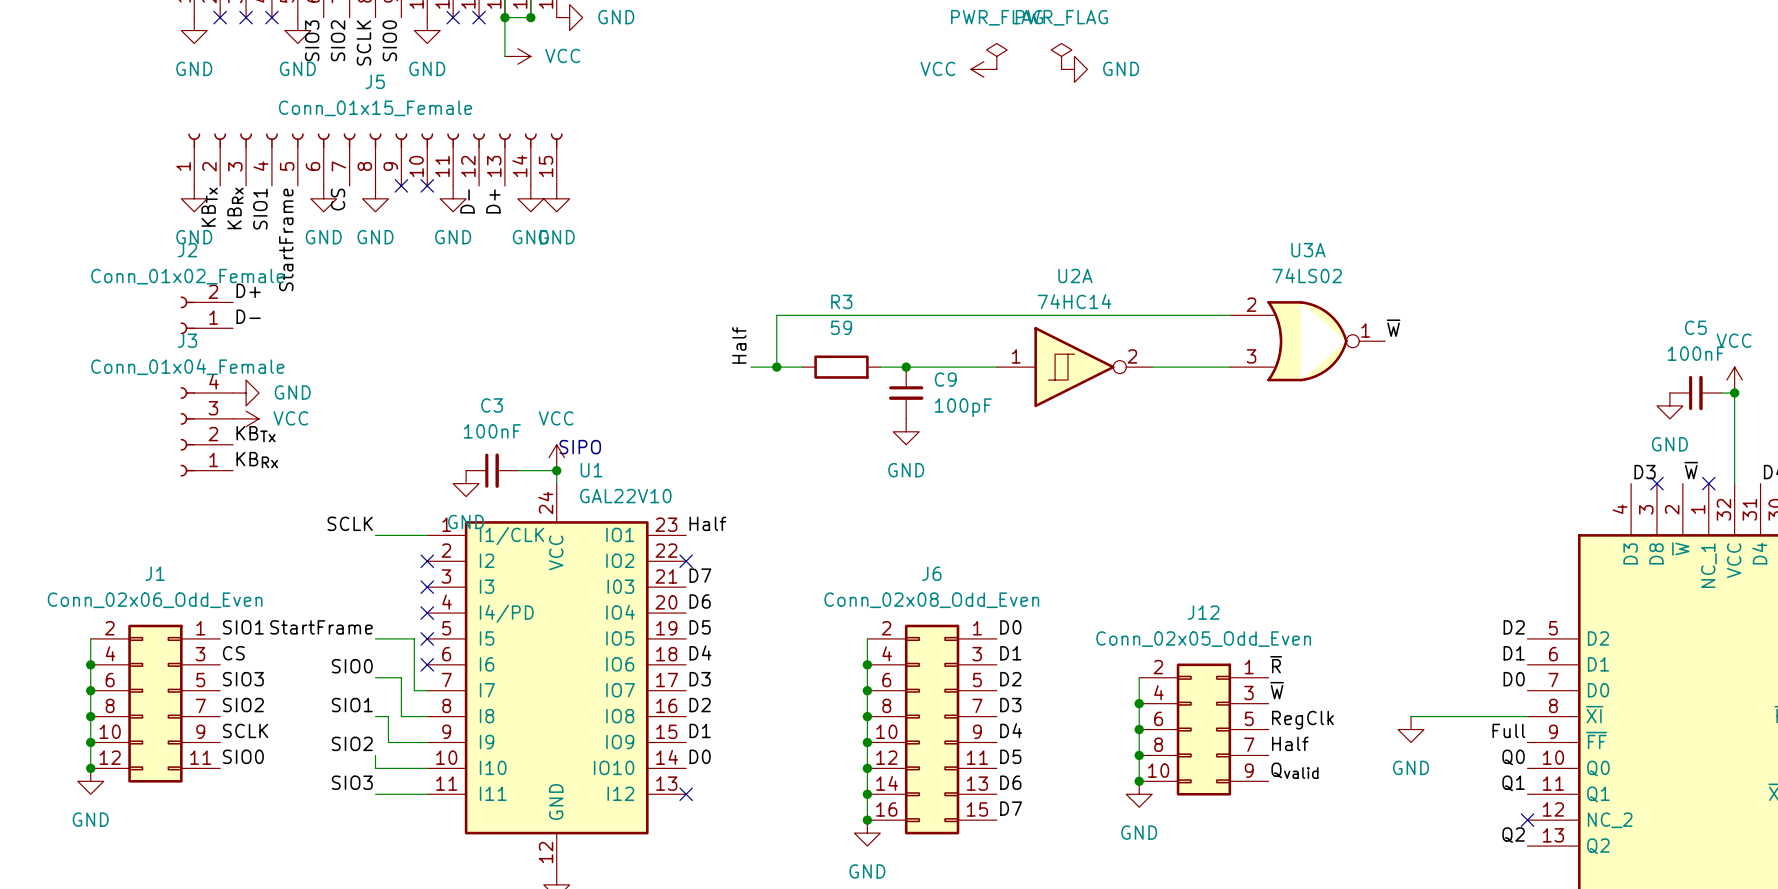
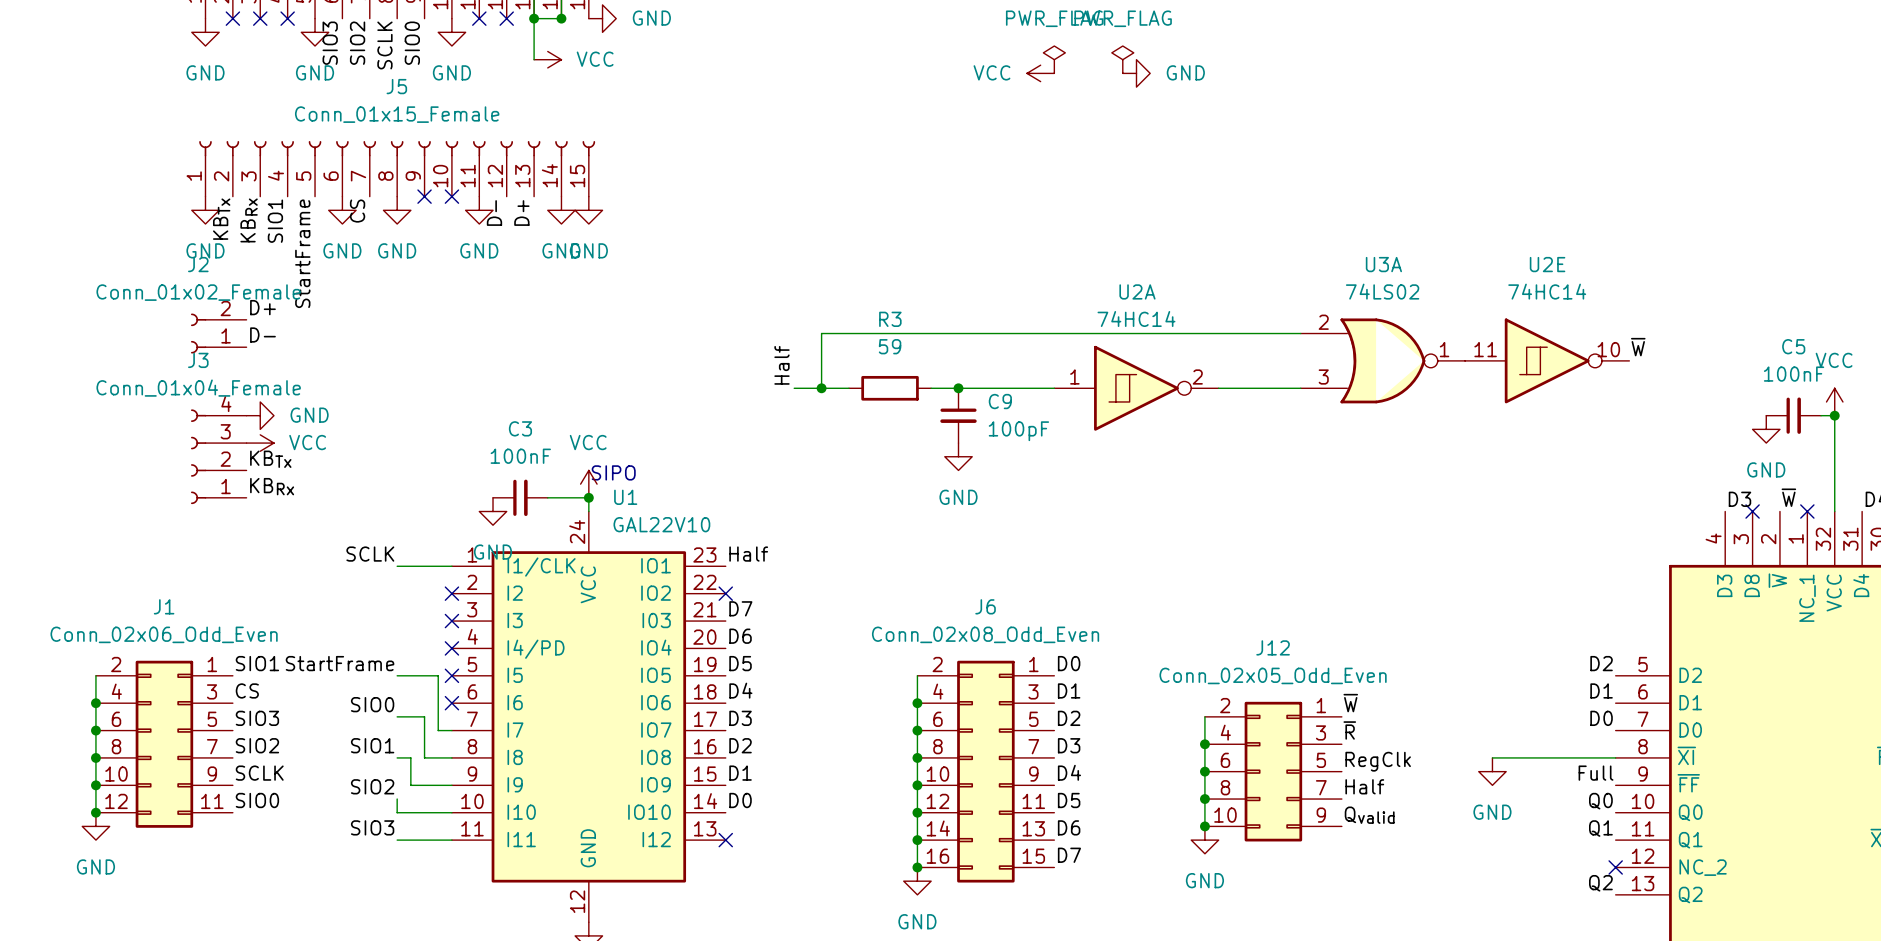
label position: ~{W} (1393, 328) -> ~{W} (1638, 347)
U2E: none -> 74HC14 (1547, 360)
label: ~{R} (1276, 664) -> ~{W} (1350, 703)
label: ~{W} (1277, 690) -> ~{R} (1349, 730)

